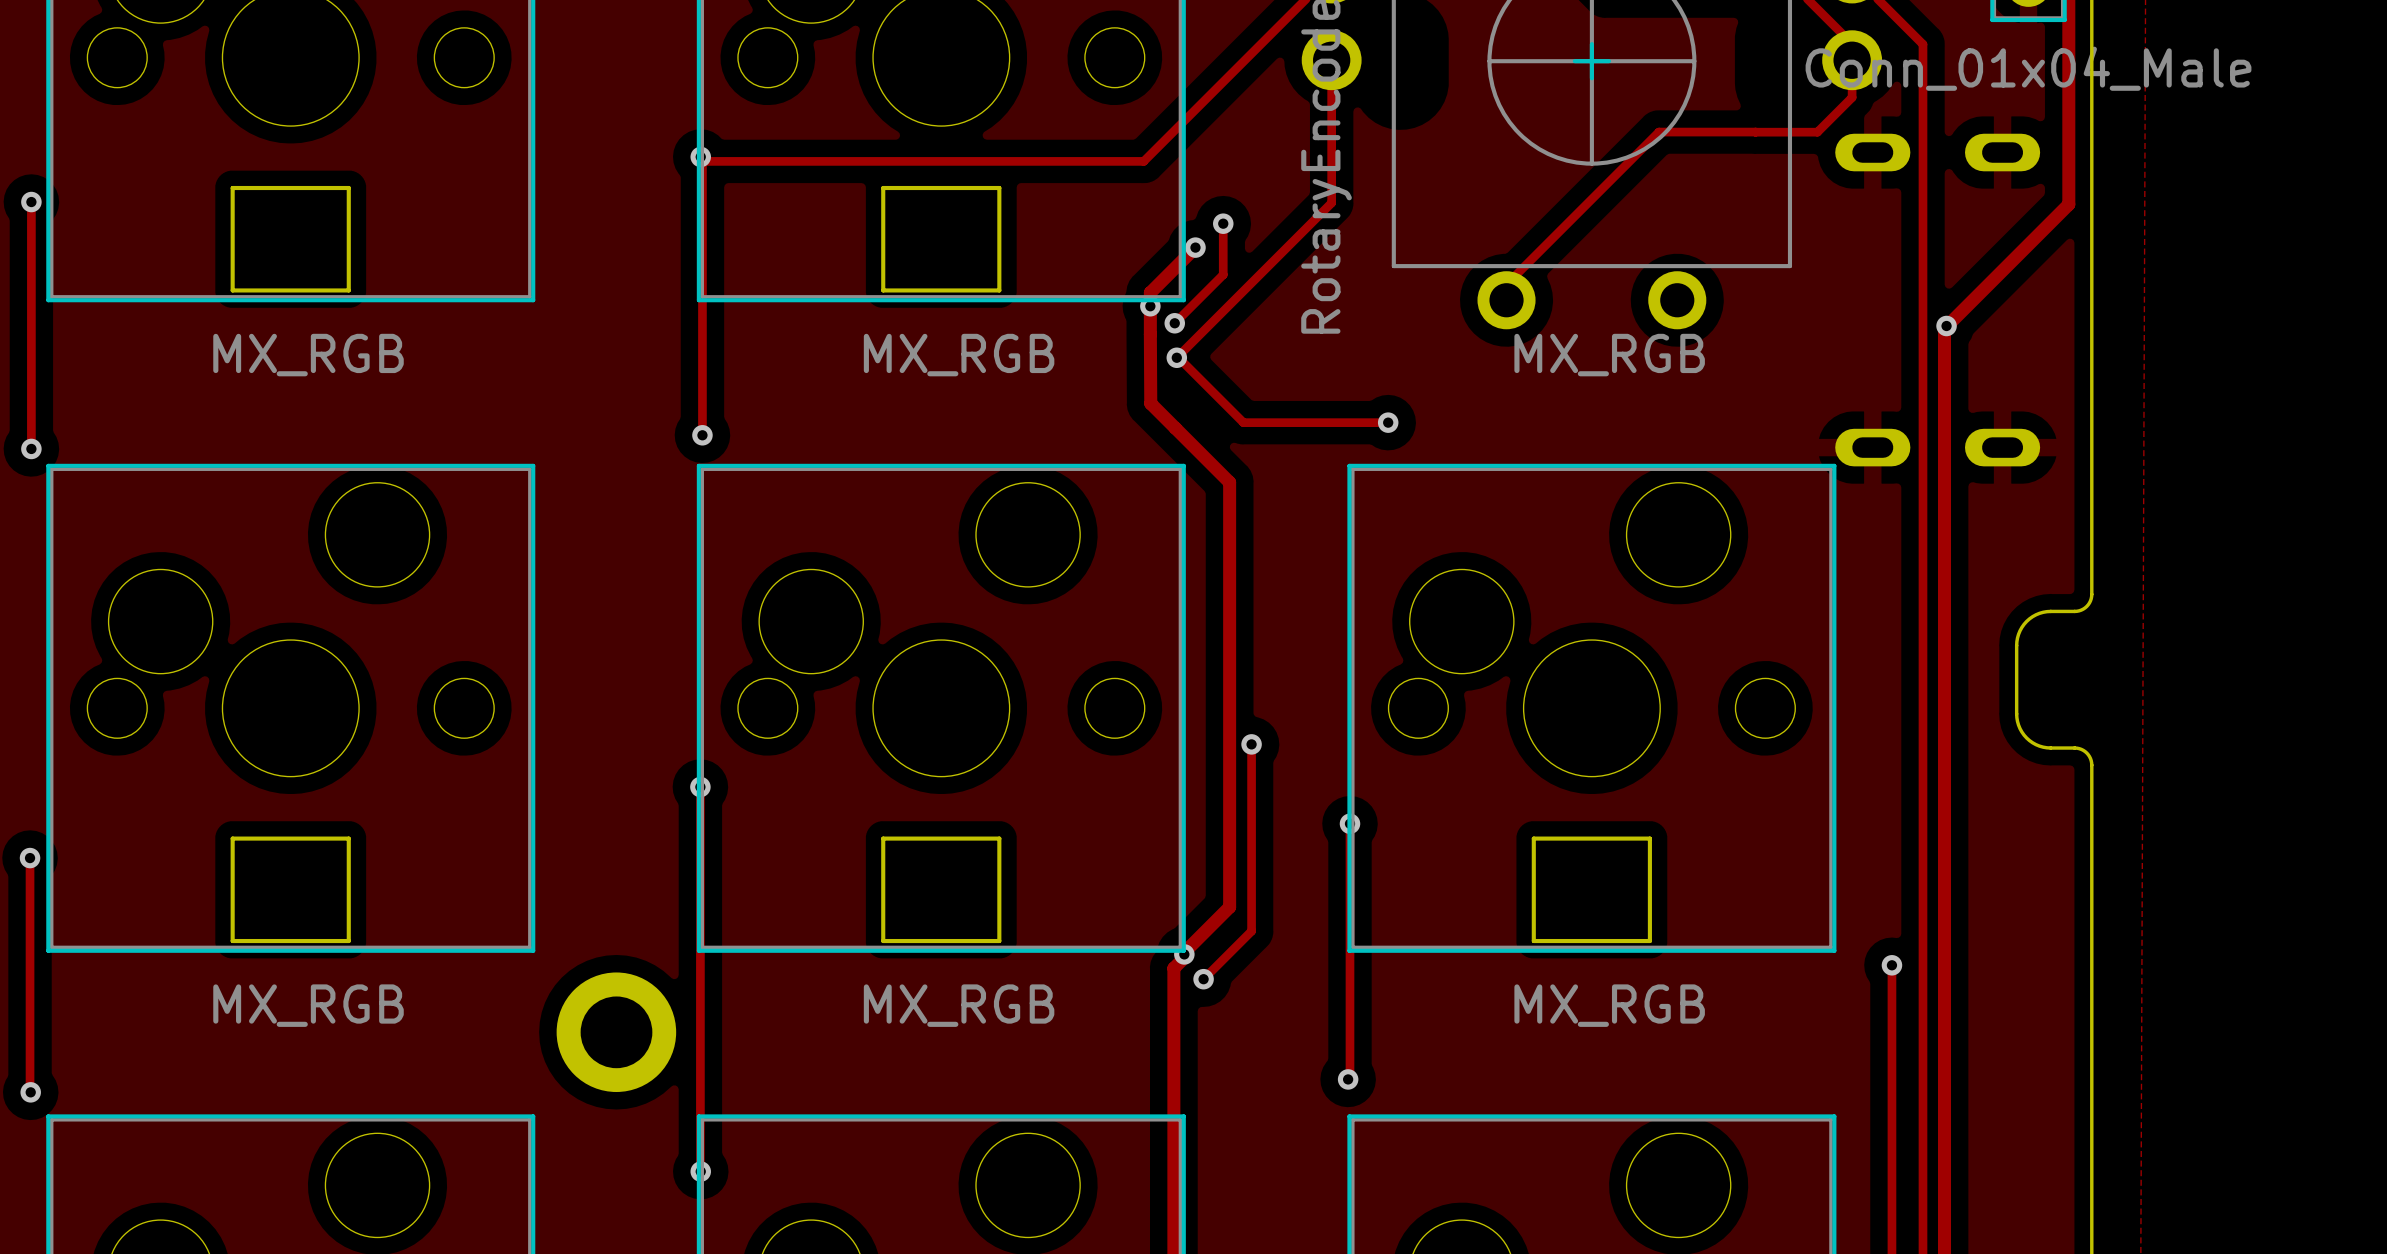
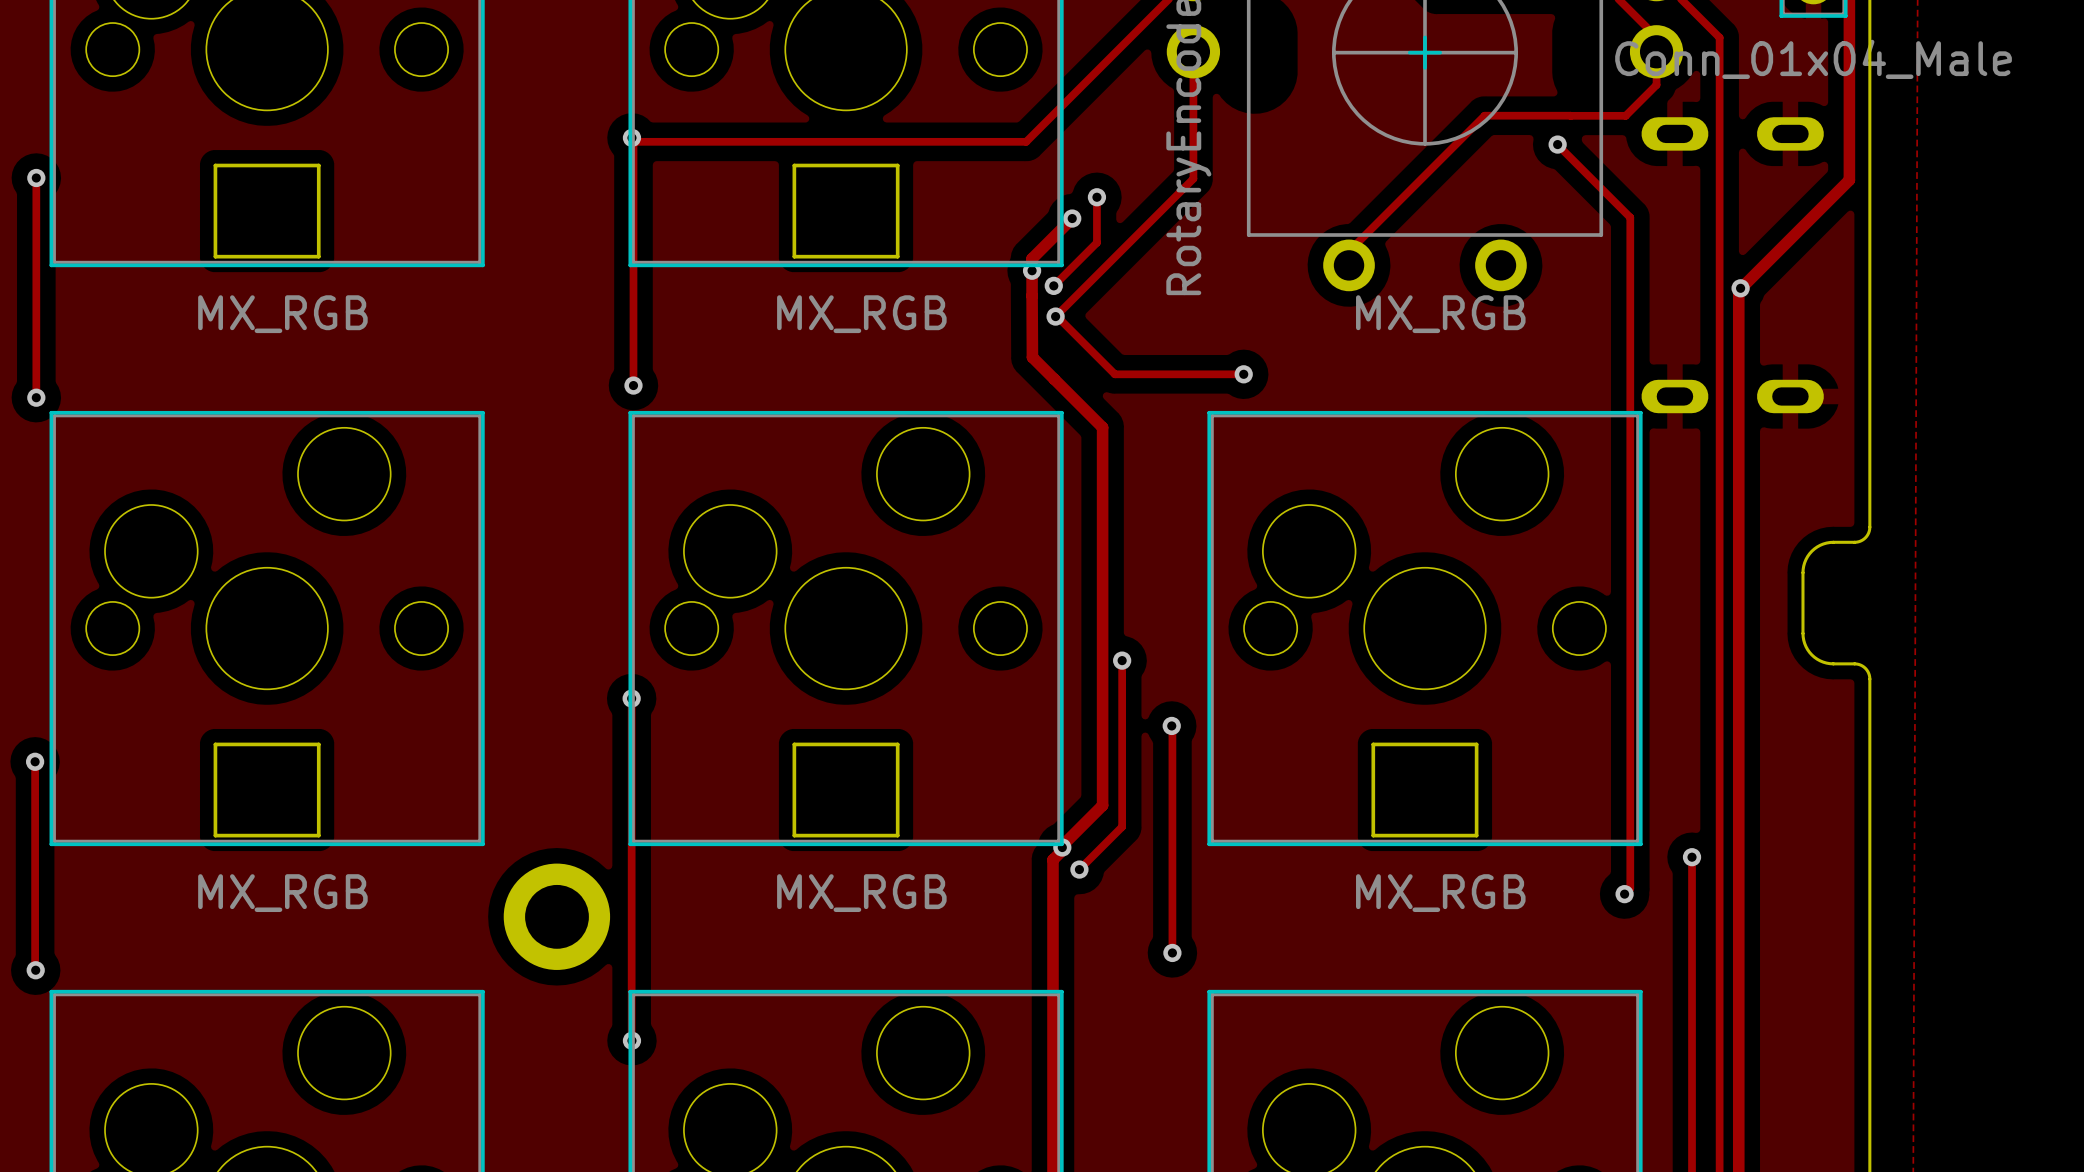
track: none -> (1557, 144) (1630, 217) (1630, 888) (1624, 894)
via: none -> (1557, 144)
track: none -> (1171, 725) (1172, 952)
track: (1349, 823) (1349, 1077) (1348, 1079) -> none
via position: (1349, 823) -> (1171, 725)
via: none -> (1624, 894)
via position: (1348, 1079) -> (1172, 952)

